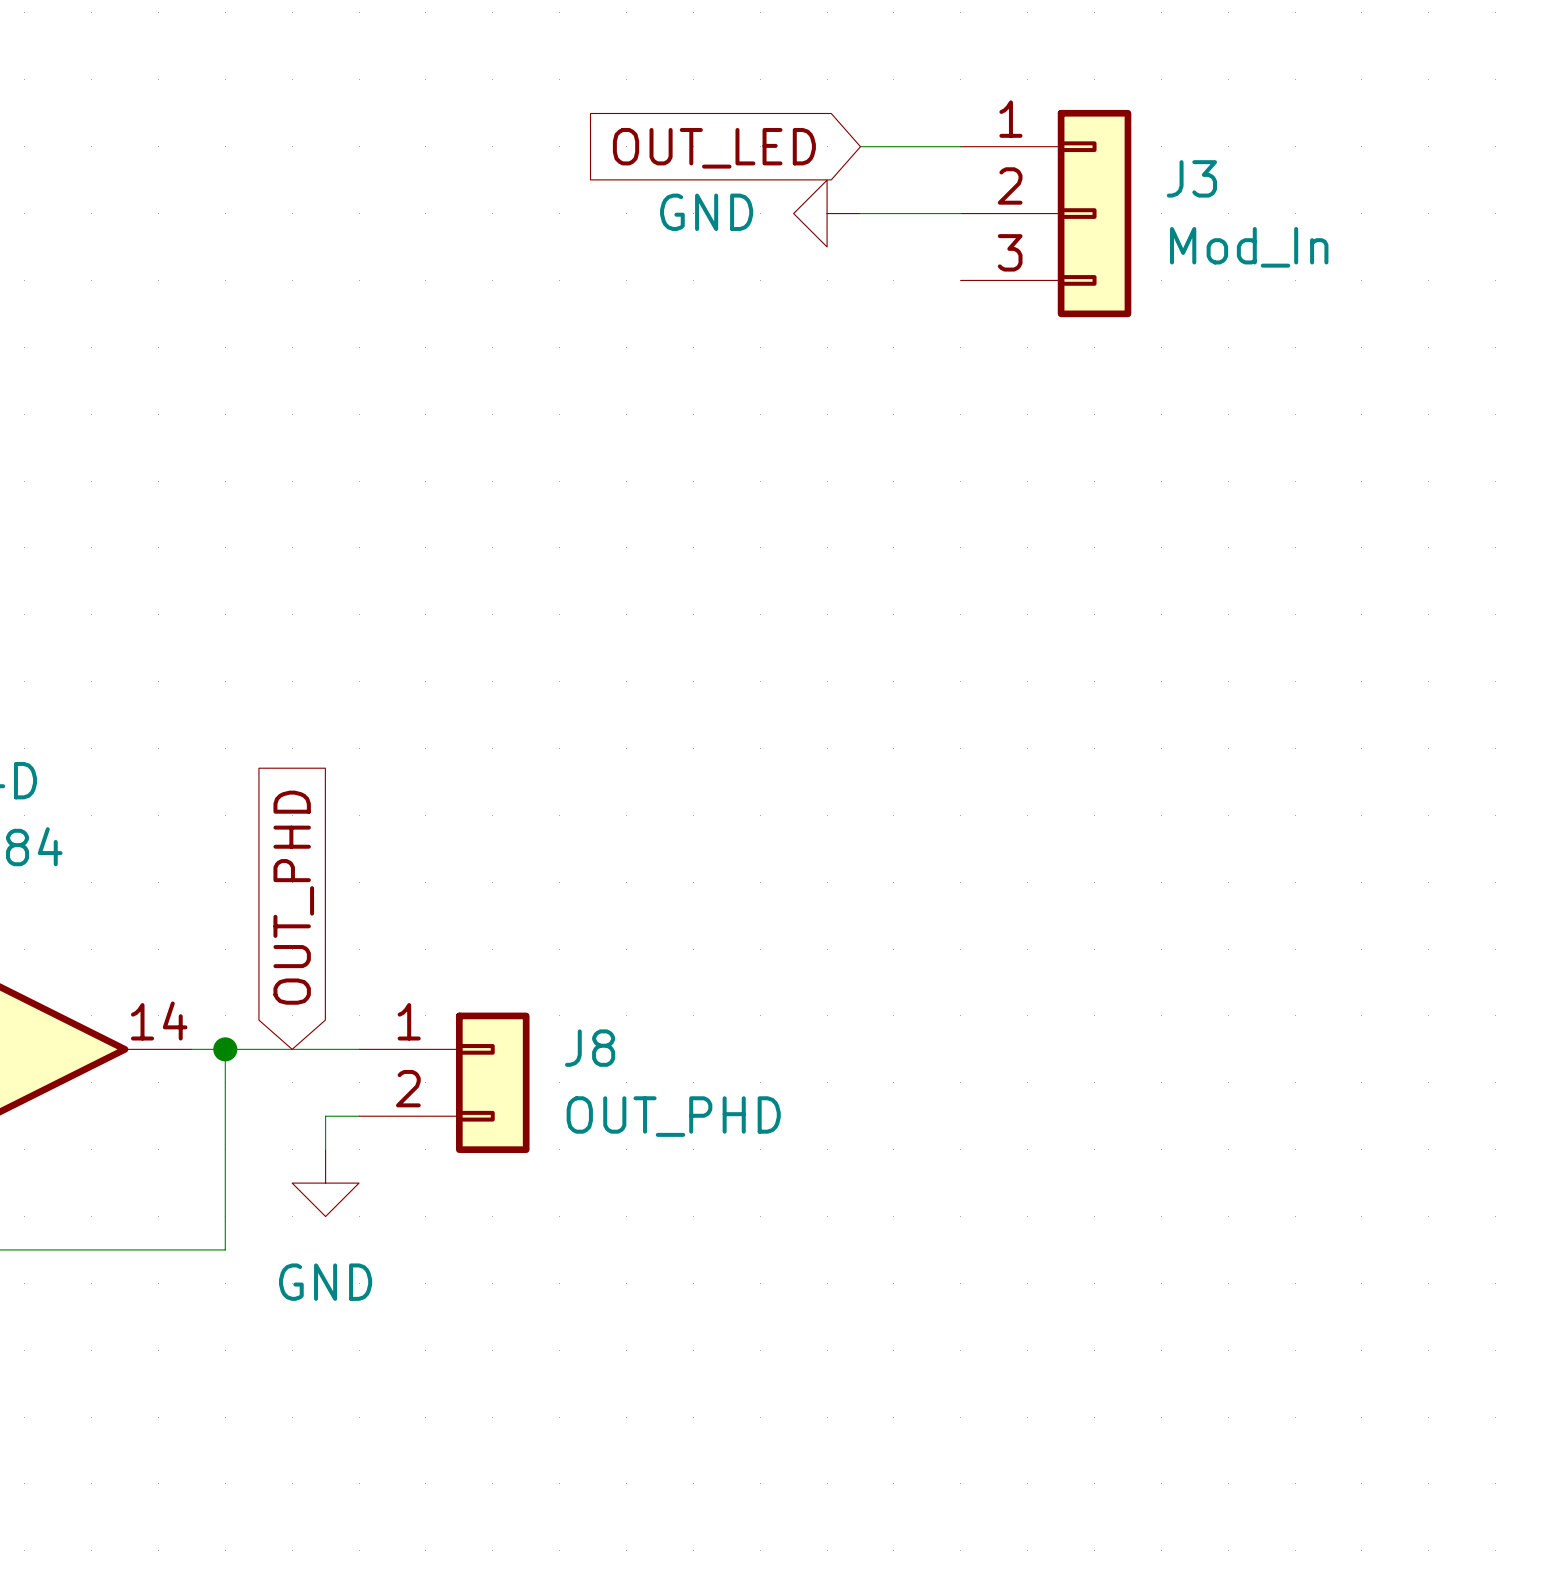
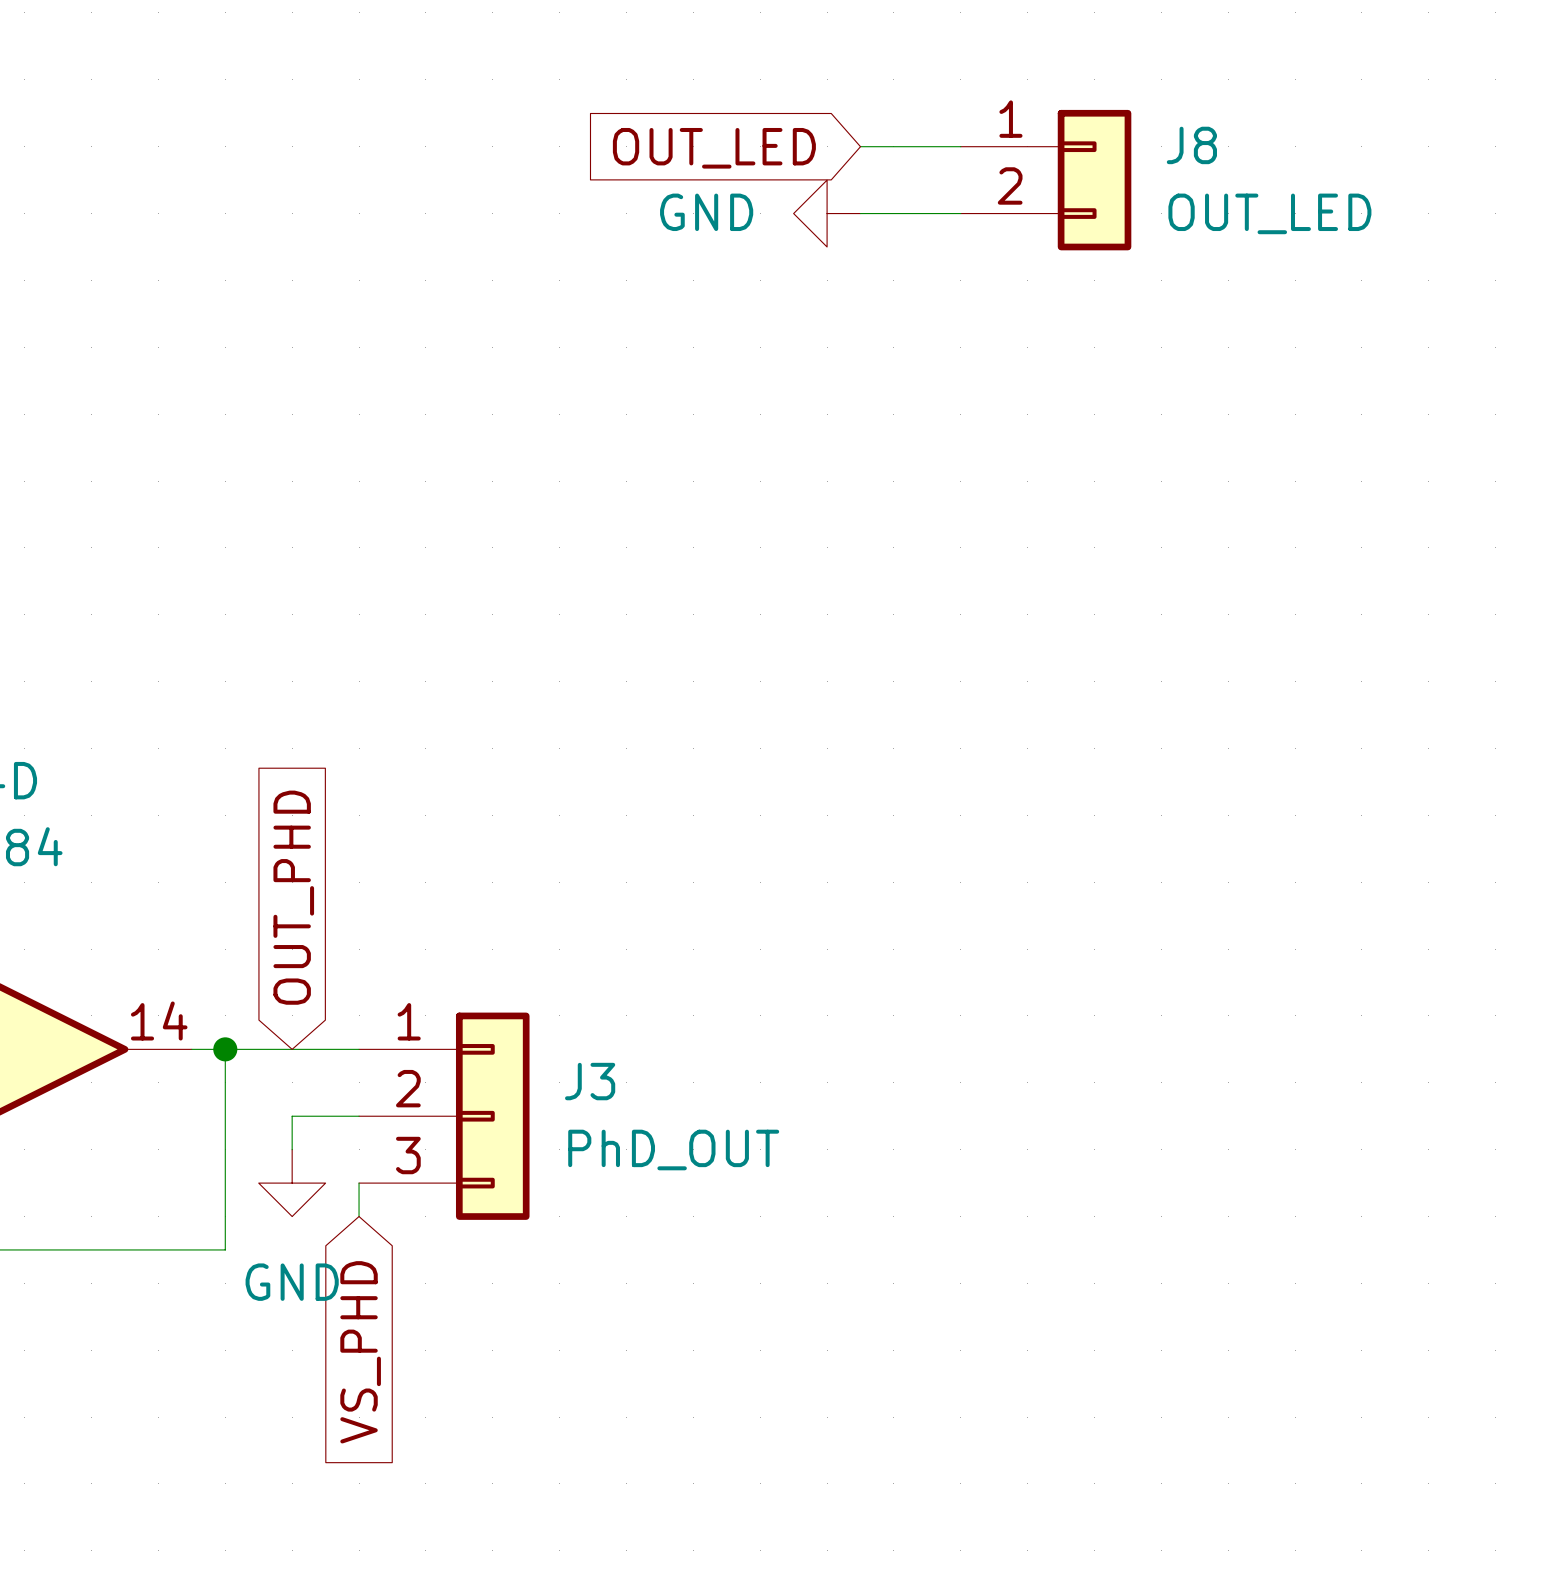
J3 position: (1046, 213) -> (444, 1116)
J3 value: Mod_In (1249, 247) -> PhD_OUT (673, 1150)
J8 position: (444, 1082) -> (1046, 180)
wire: (325, 1116) (325, 1149) -> (325, 1116) (292, 1116) (292, 1149)
J8 value: OUT_PHD (673, 1116) -> OUT_LED (1269, 213)
power symbol position: GND (325, 1183) -> GND (292, 1183)
wire: none -> (359, 1183) (359, 1216)
global label: none -> VS_PHD (360, 1352)

